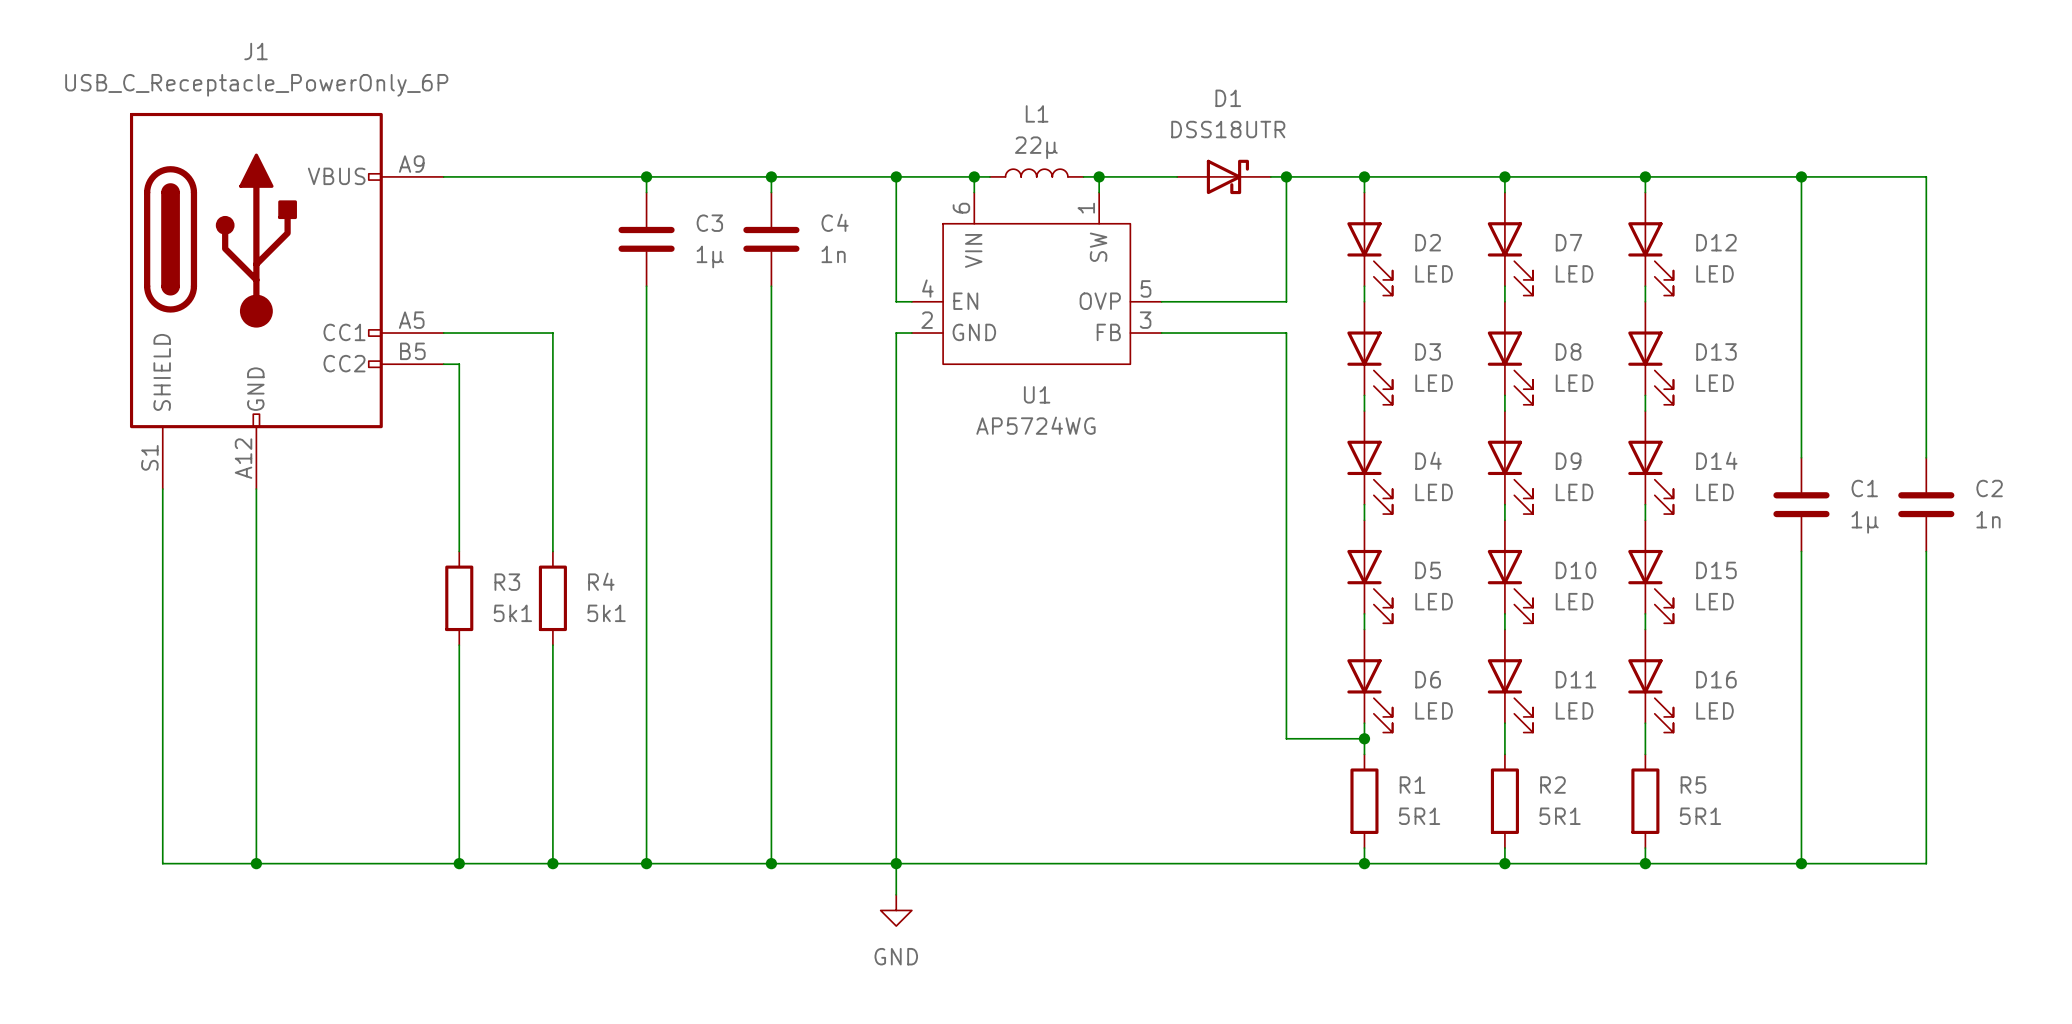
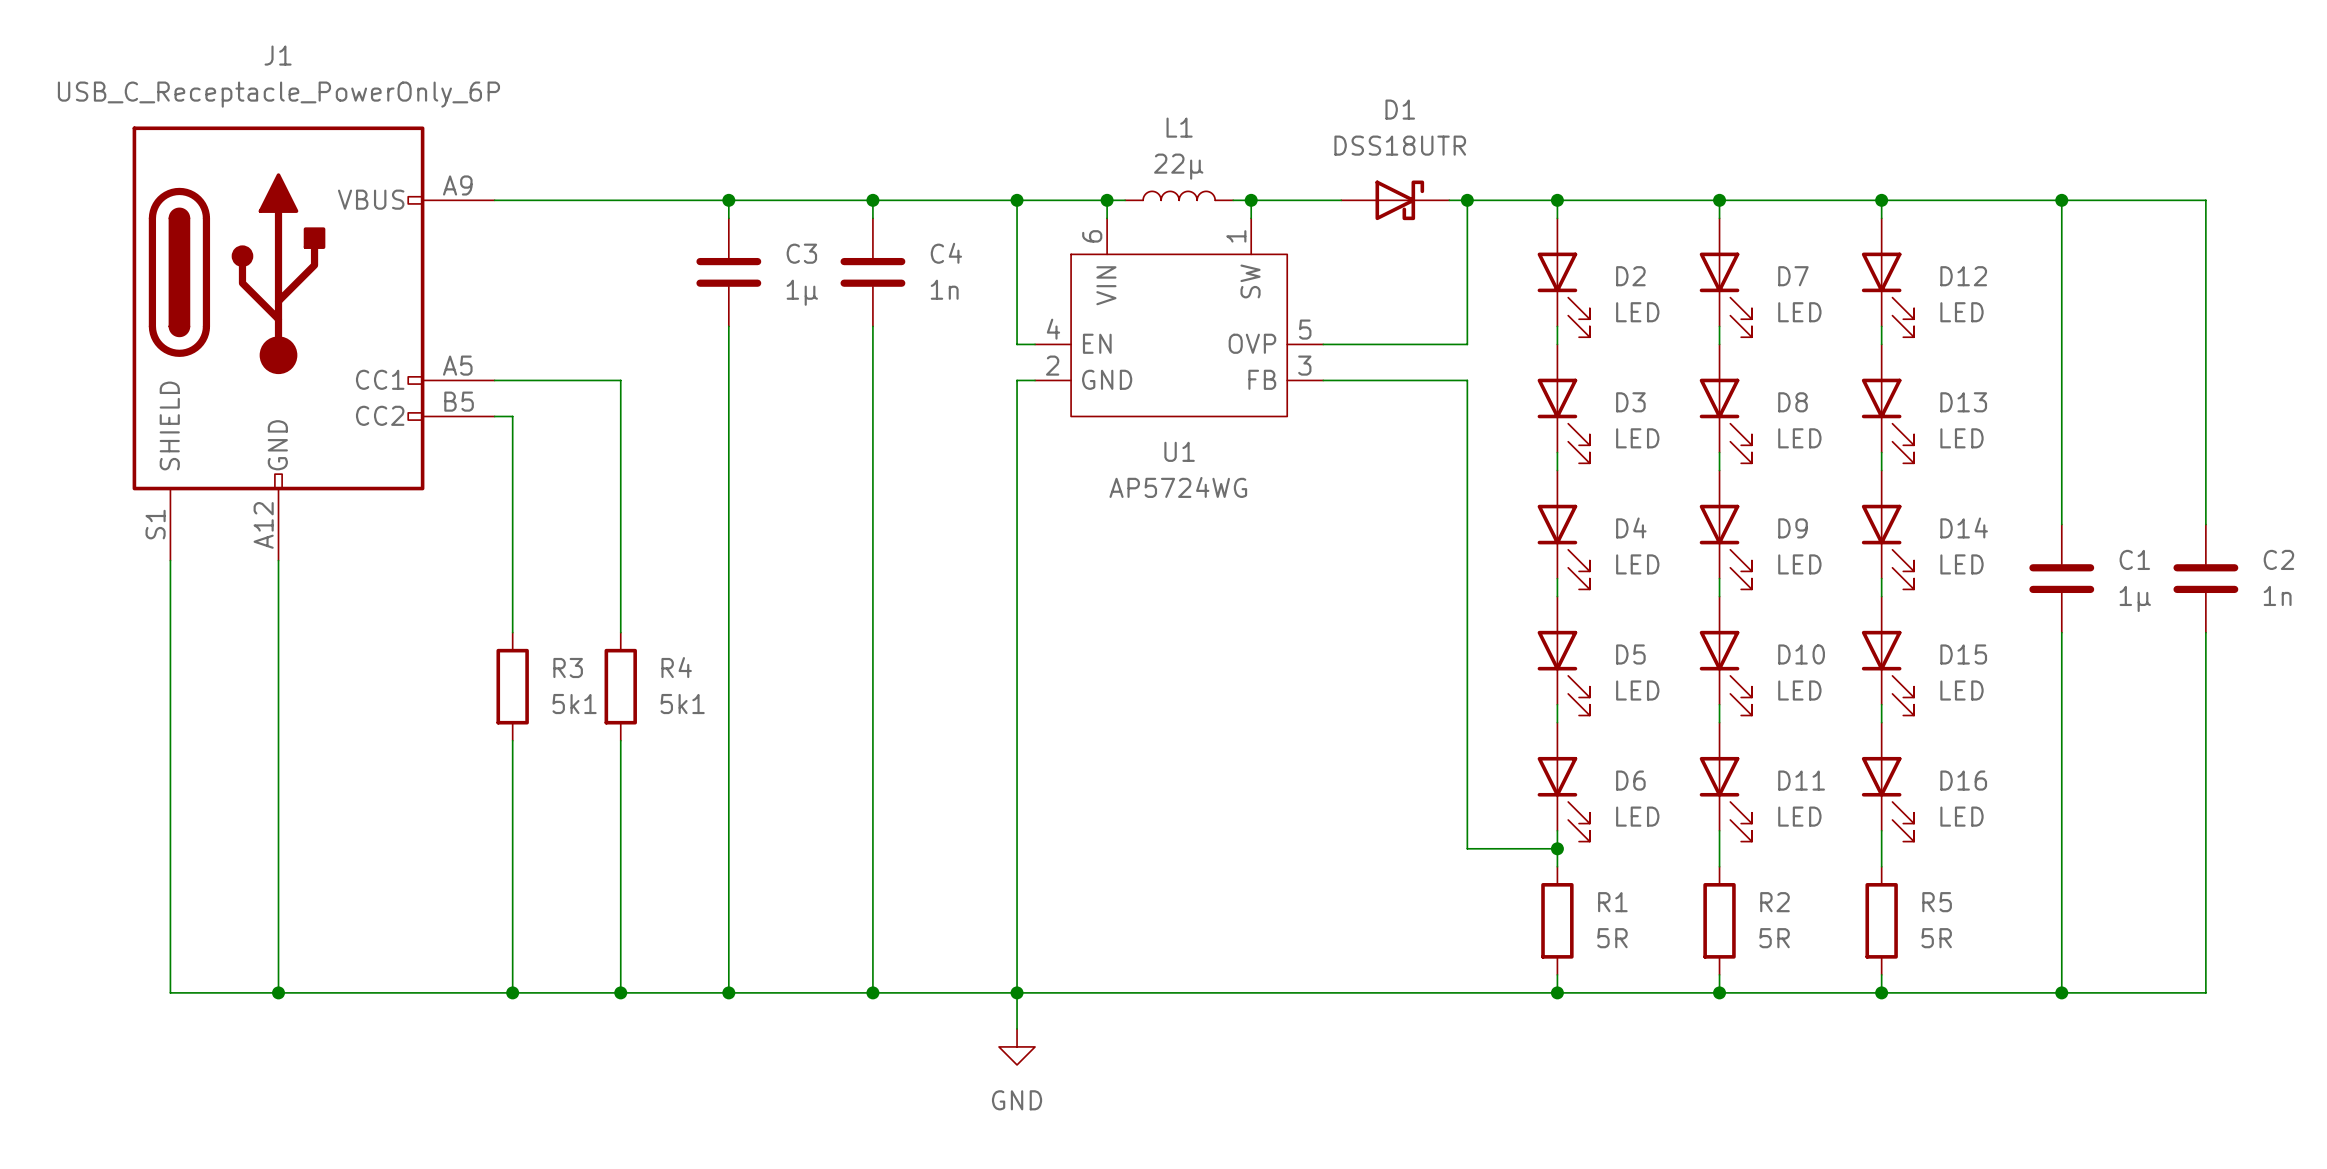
R1 value: 5R1 (1419, 816) -> 5R (1612, 938)
R2 value: 5R1 (1560, 816) -> 5R (1774, 938)
R5 value: 5R1 (1700, 816) -> 5R (1936, 938)

